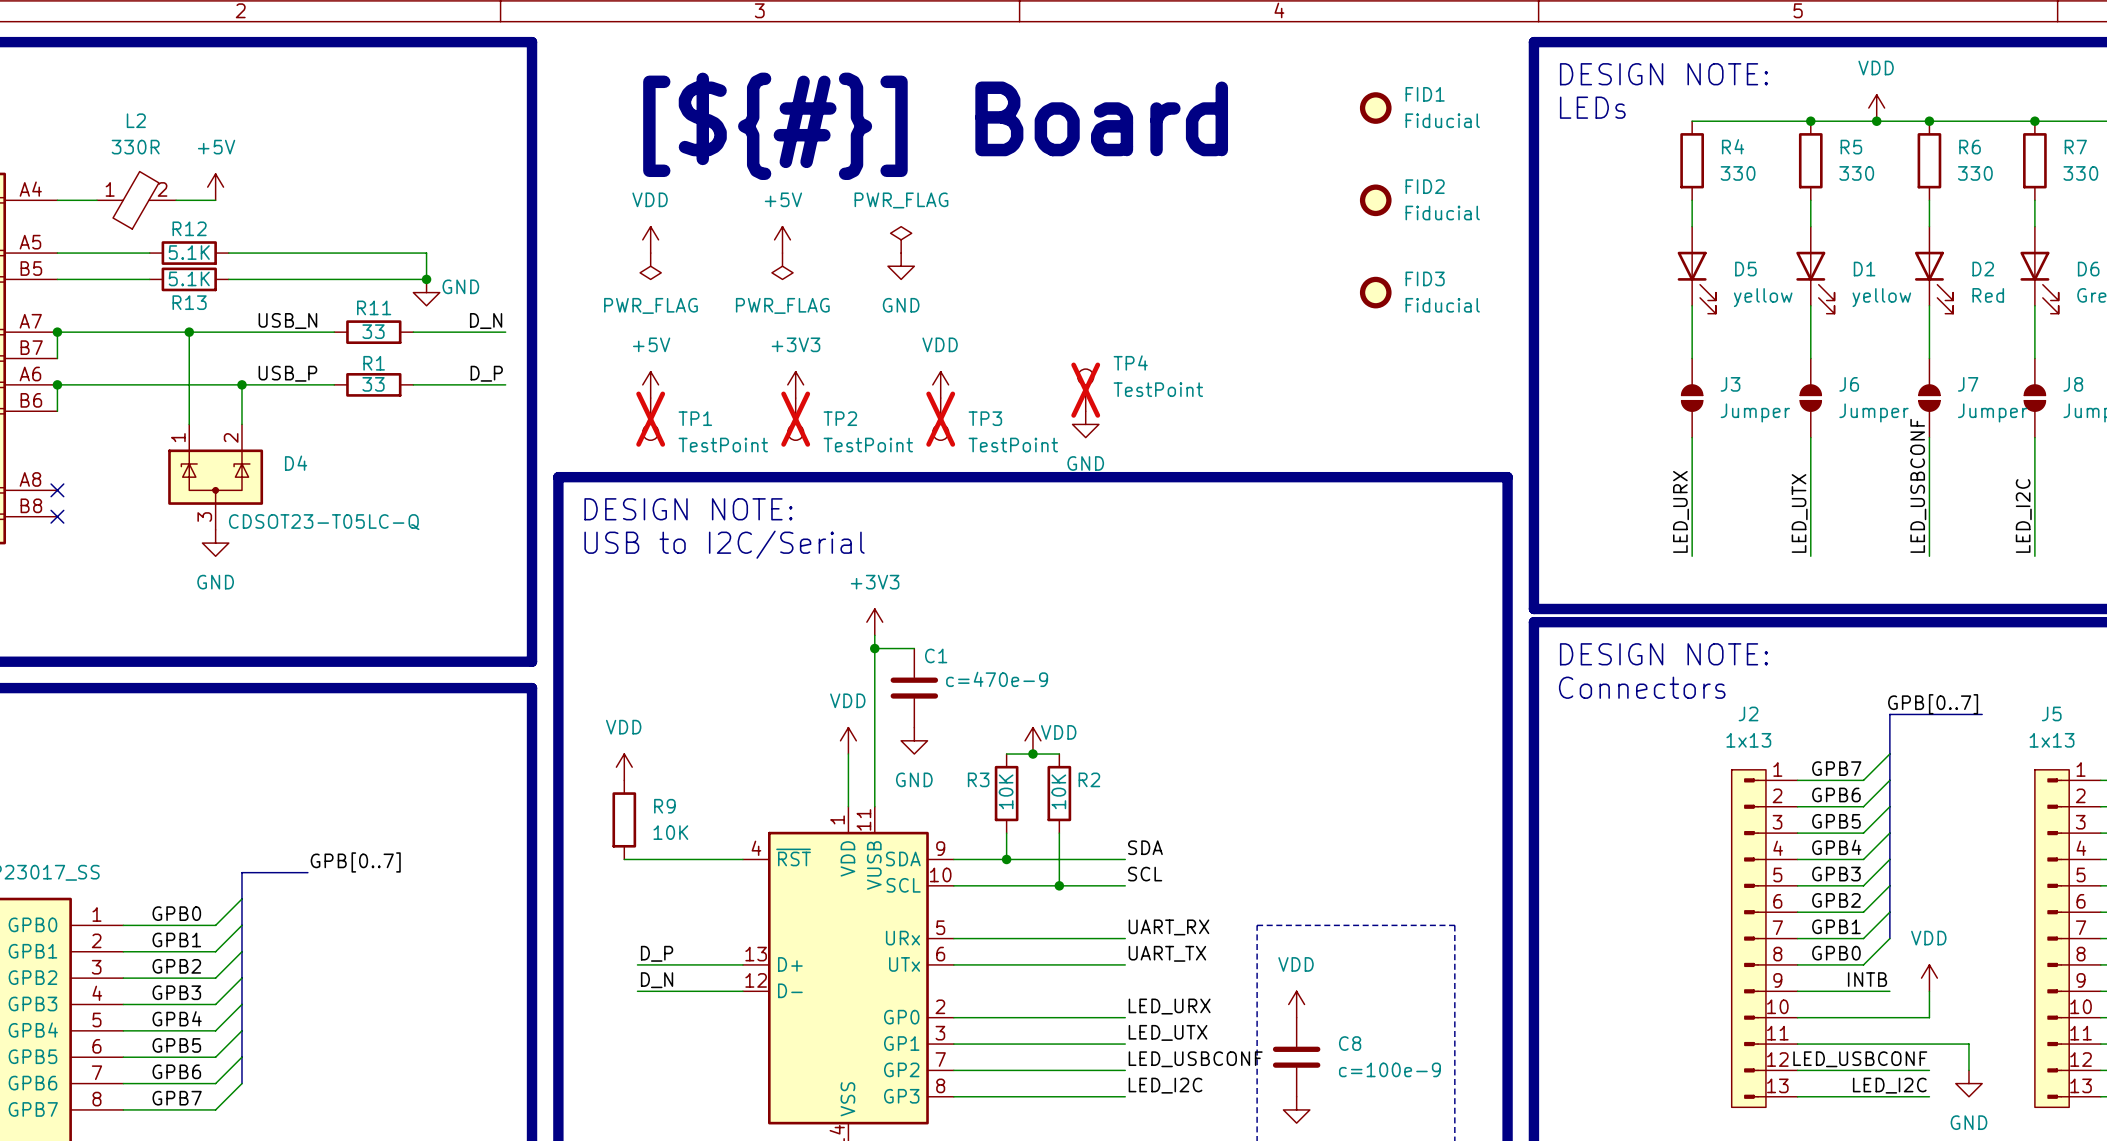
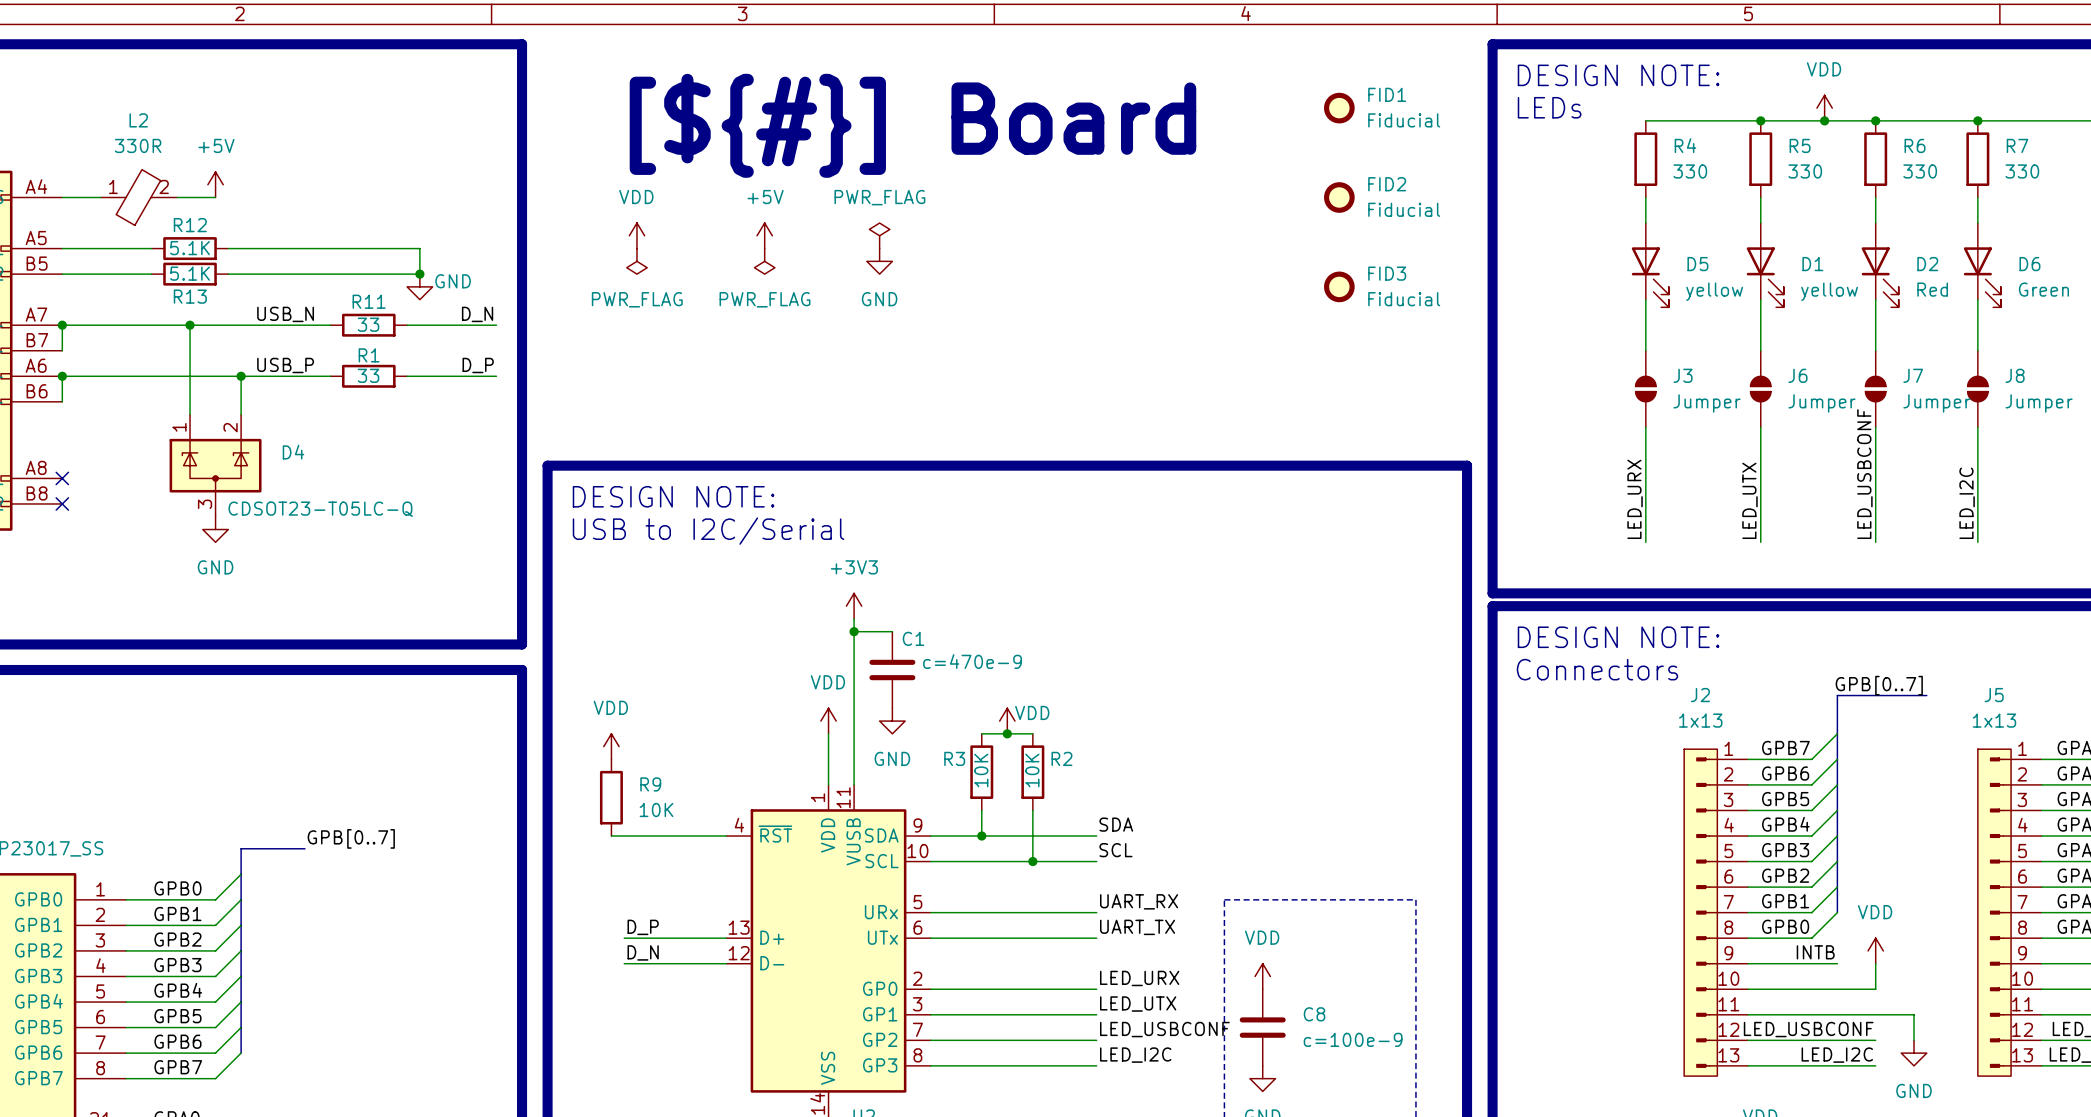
power symbol: +5V (650, 384) -> none
power symbol: +3V3 (795, 384) -> none
power symbol: VDD (940, 384) -> none
TP4: TestPoint (1085, 390) -> none
TP1: TestPoint (650, 419) -> none
TP2: TestPoint (795, 419) -> none
TP3: TestPoint (940, 419) -> none
power symbol: GND (1085, 424) -> none

